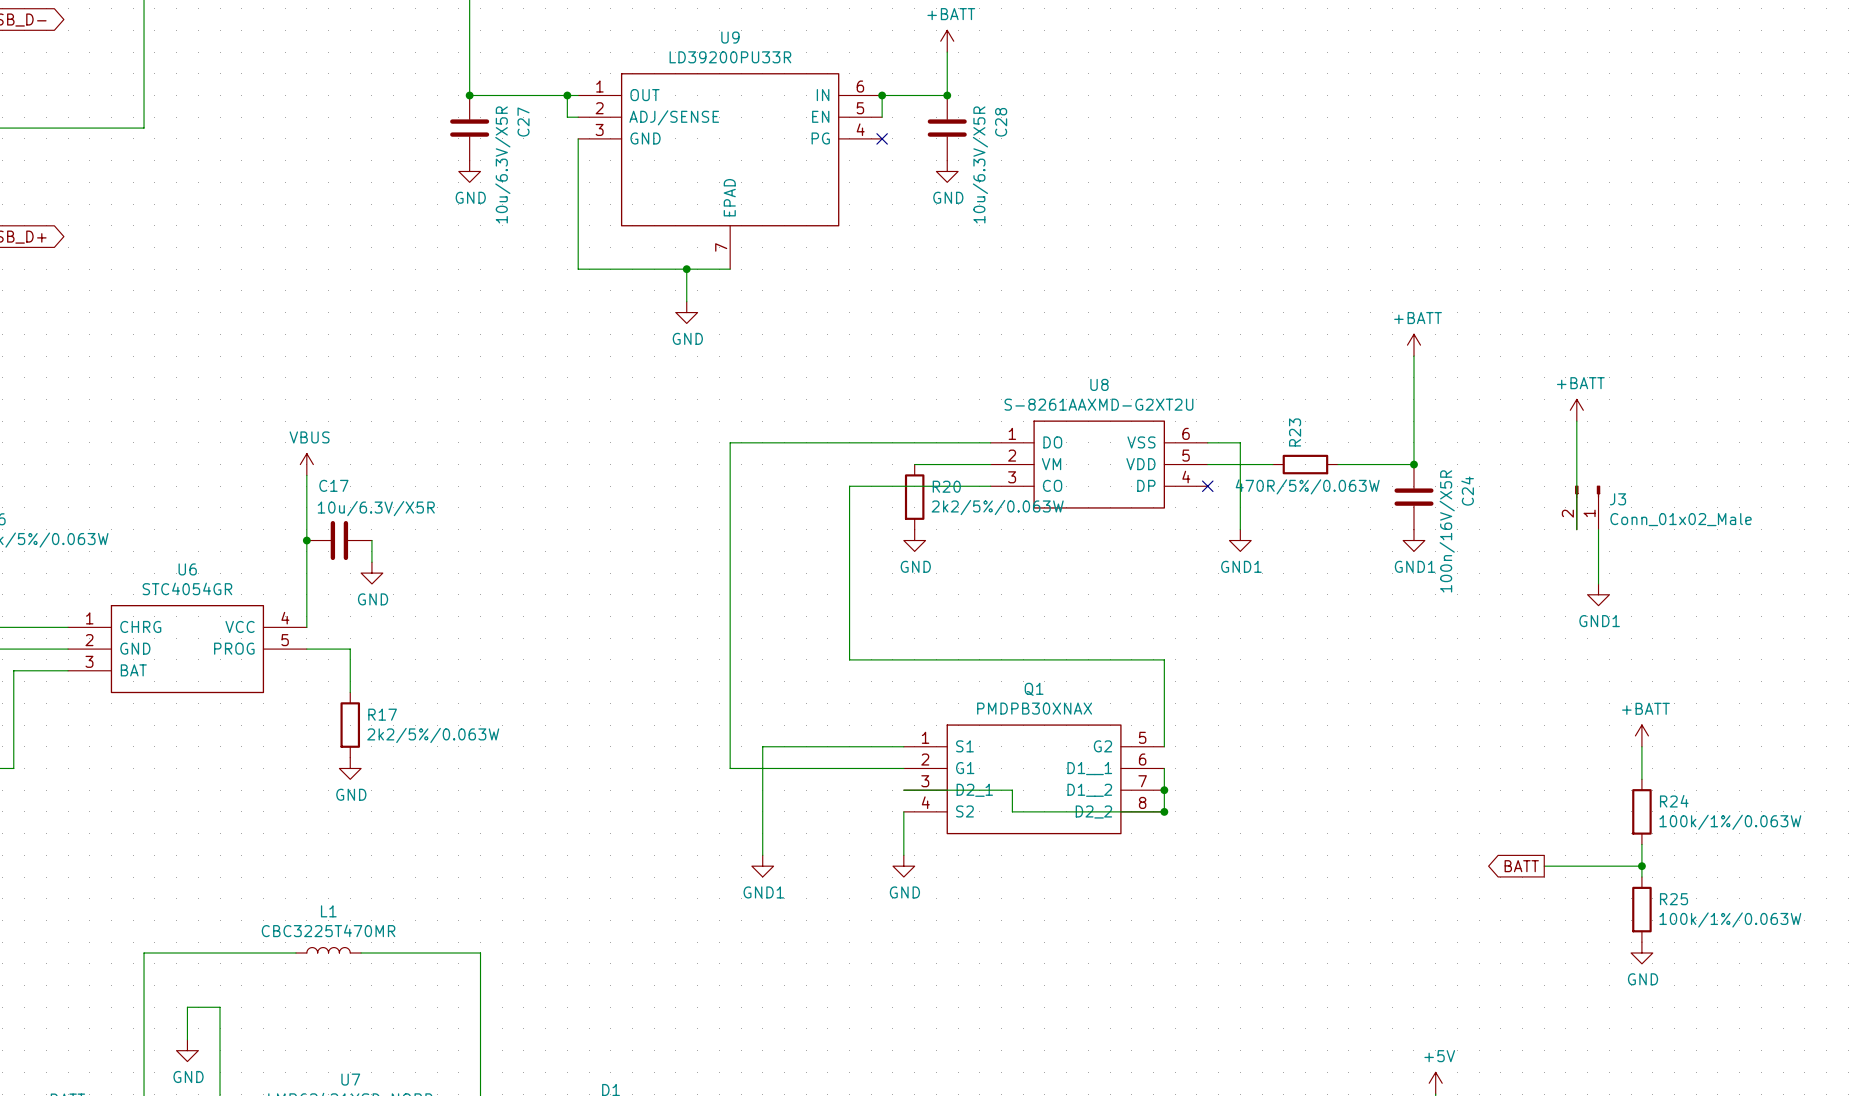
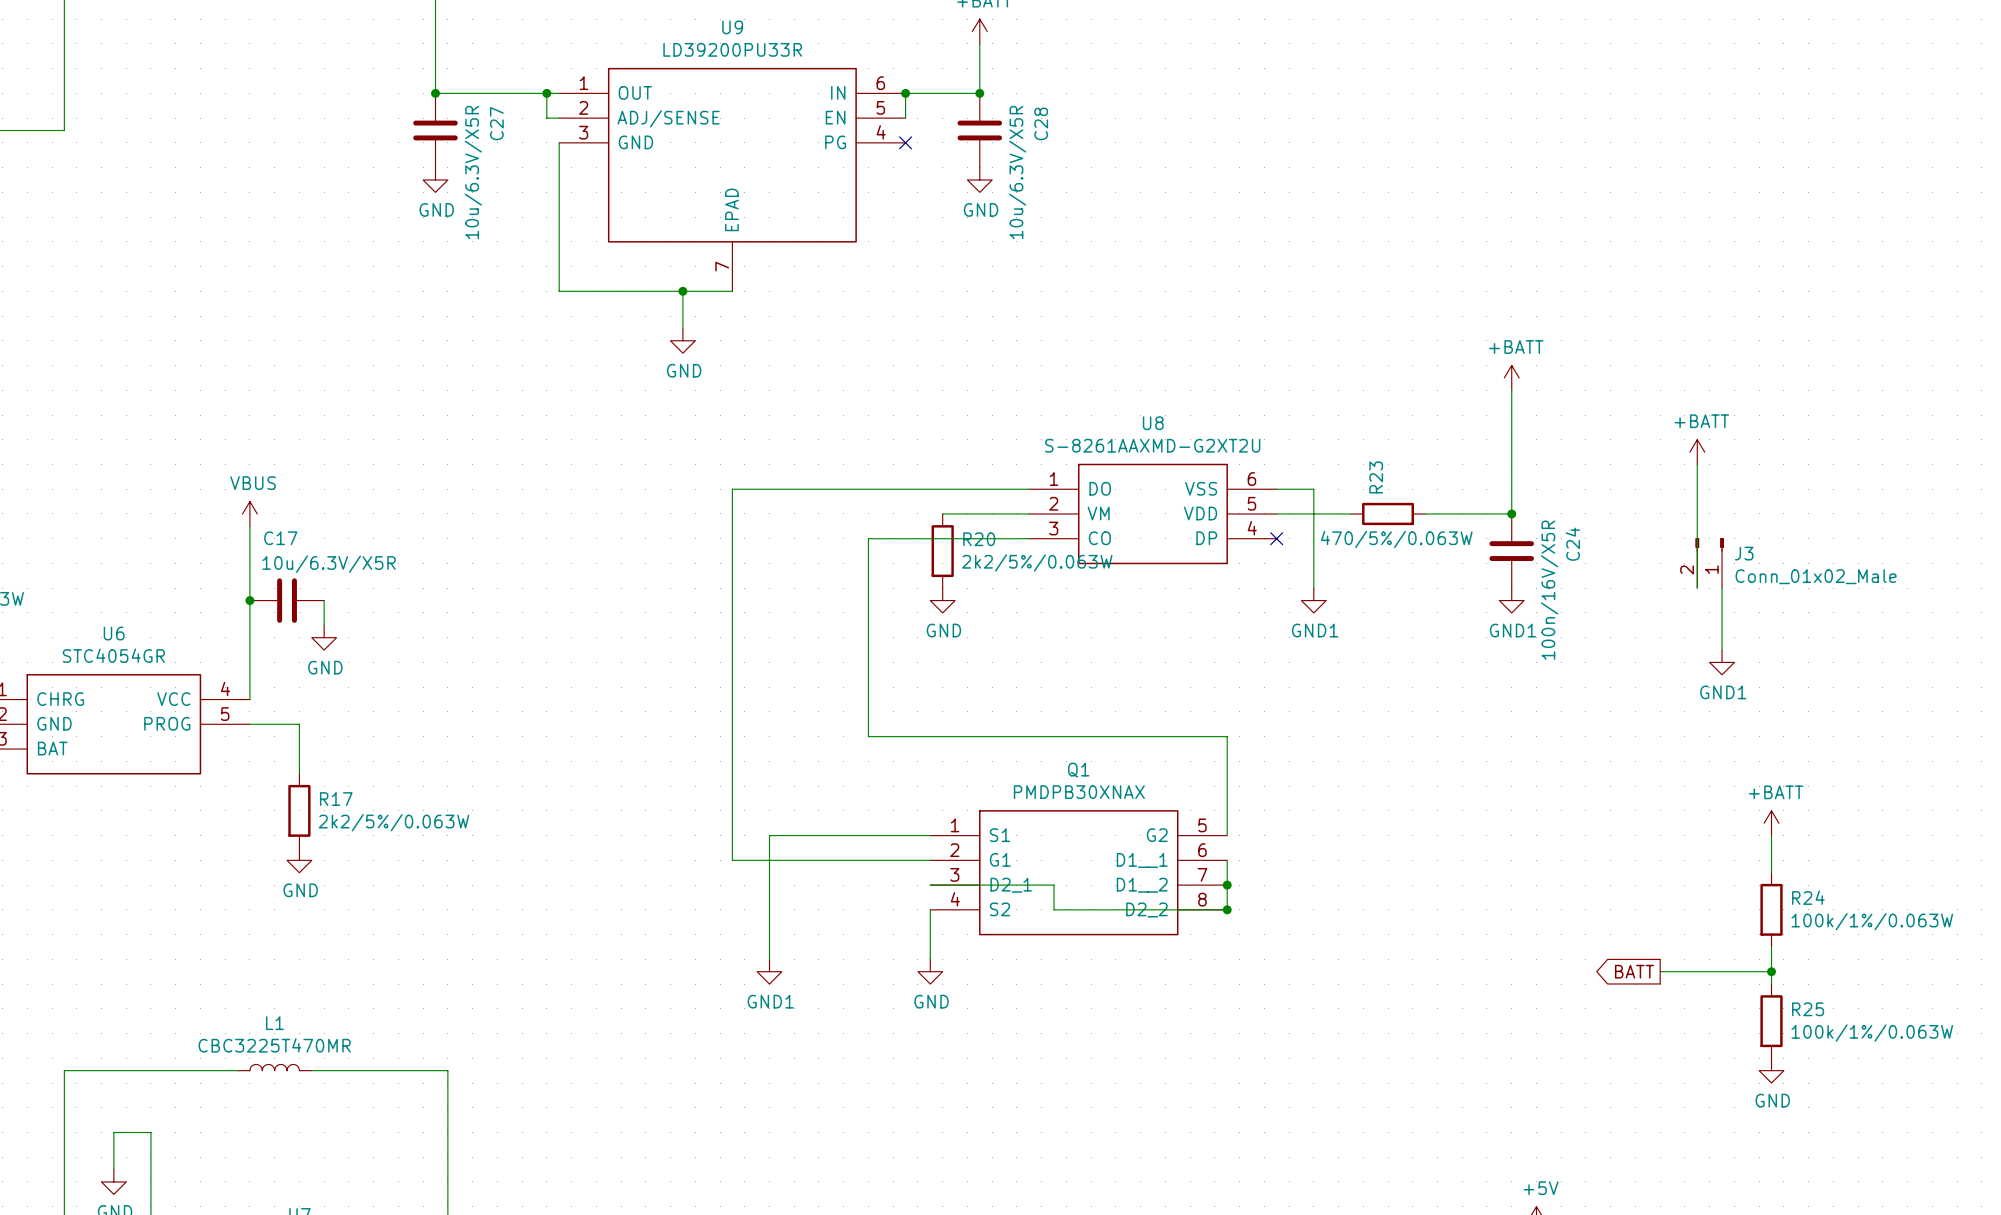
R23 value: 470R/5%/0.063W (1307, 486) -> 470/5%/0.063W (1396, 539)

